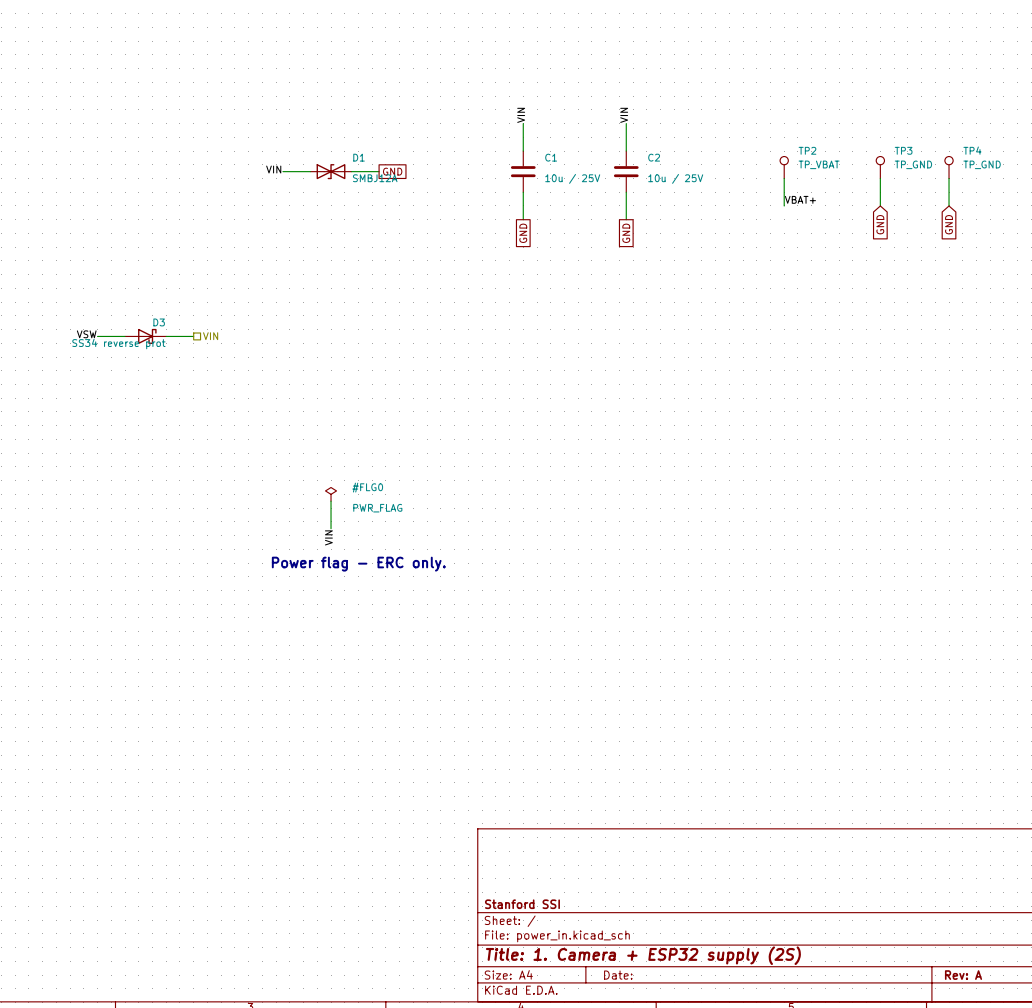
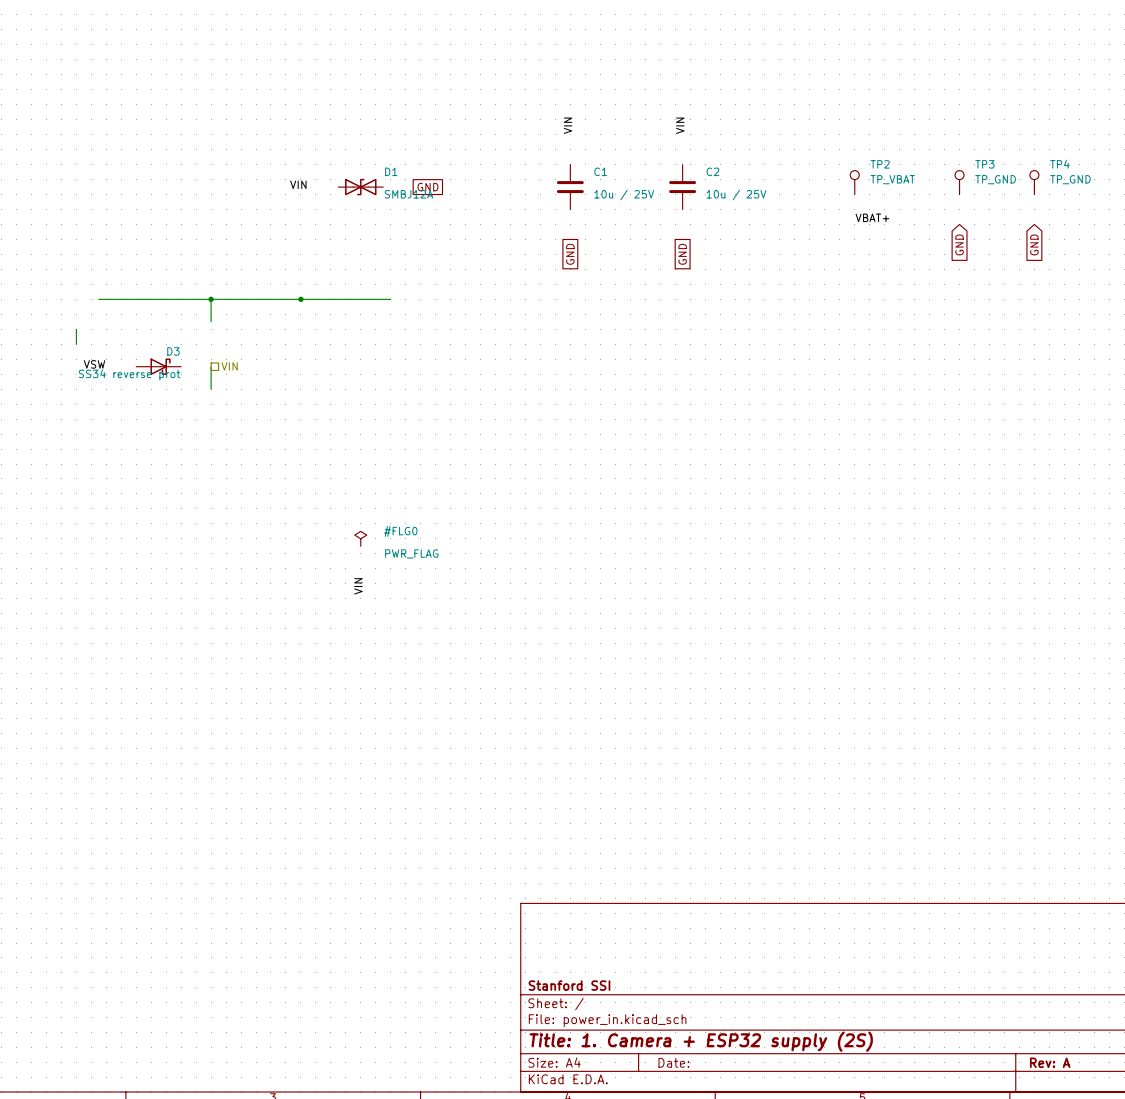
wire: (523, 123) (523, 151) -> none
wire: (626, 123) (626, 151) -> none
wire: (282, 171) (310, 171) -> none
wire: (351, 171) (379, 171) -> none
wire: (784, 178) (784, 205) -> none
wire: (880, 178) (880, 205) -> none
wire: (949, 178) (949, 205) -> none
wire: (523, 192) (523, 219) -> none
wire: (626, 192) (626, 219) -> none
wire: none -> (98, 299) (390, 299)
wire: none -> (211, 299) (211, 321)
junction: none -> (211, 299)
junction: none -> (300, 299)
wire: none -> (76, 329) (76, 344)
wire: (97, 336) (125, 336) -> none
wire: (166, 336) (193, 336) -> (211, 389) (211, 366)
wire: (331, 501) (331, 528) -> none
text: Power flag - ERC only. (358, 564) -> none

